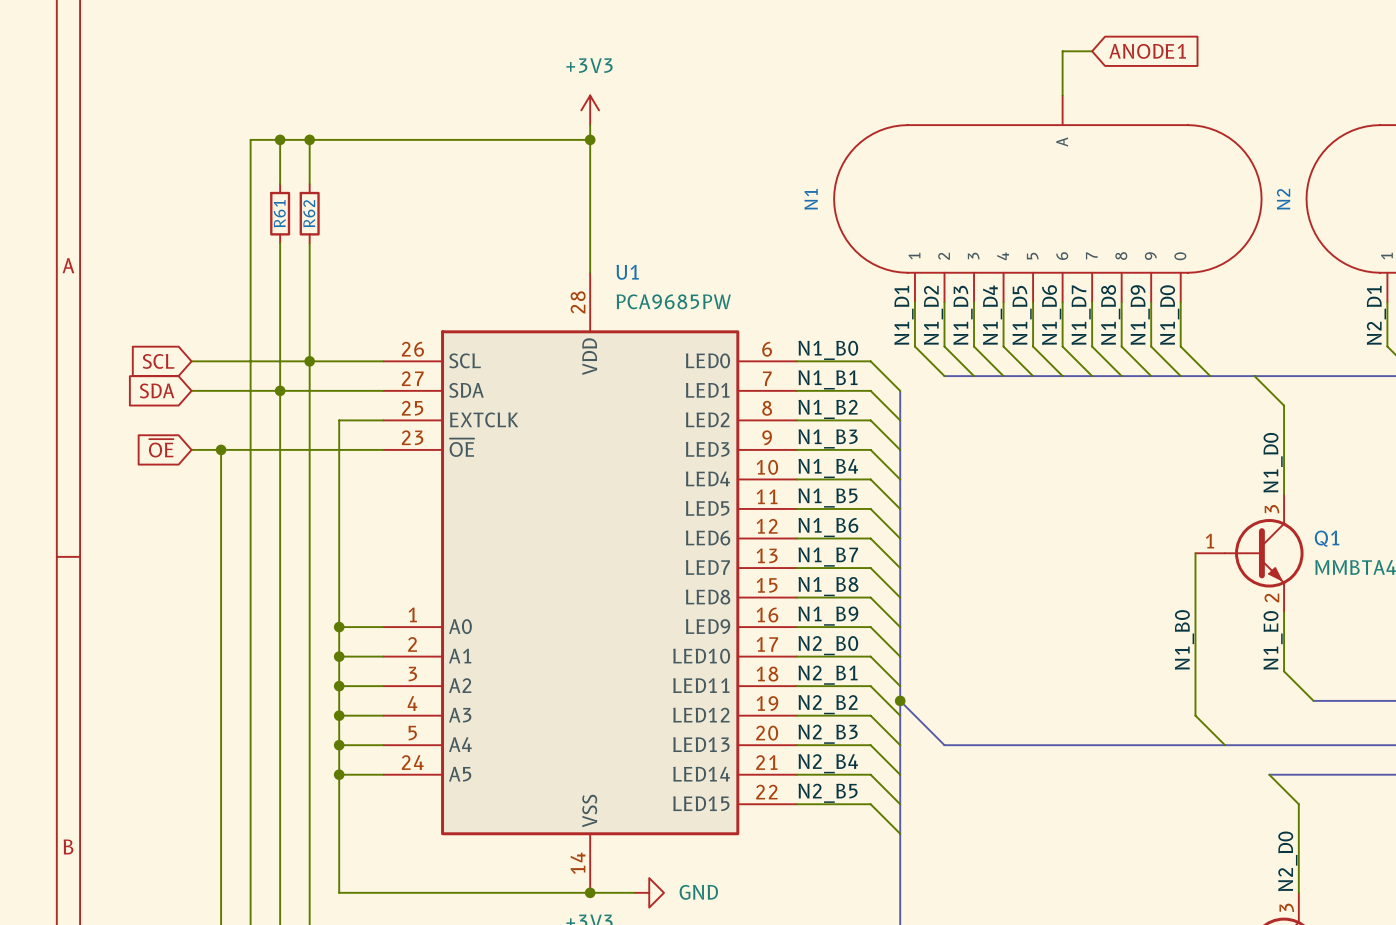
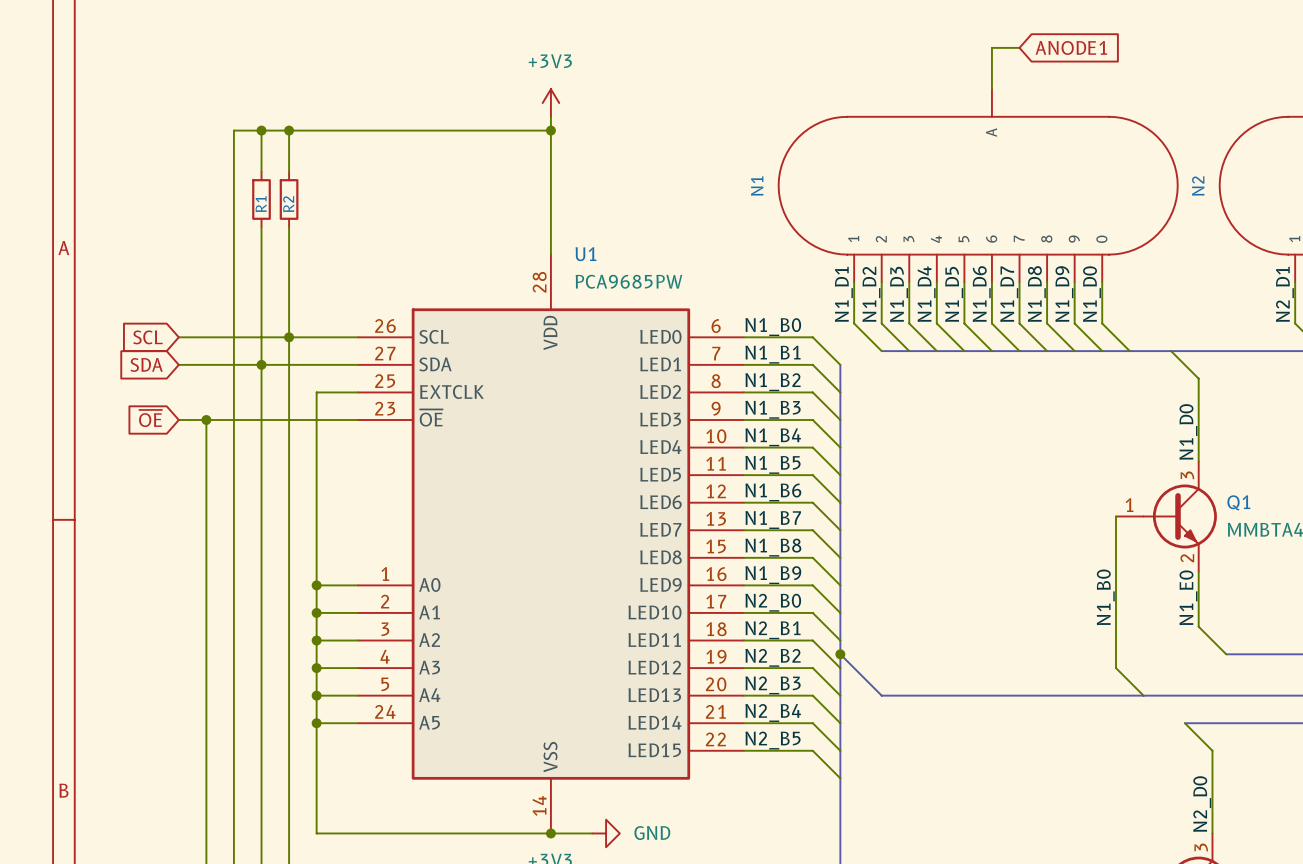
R61 name: R61 (279, 213) -> R1 (261, 204)
R62 name: R62 (309, 213) -> R2 (288, 204)

